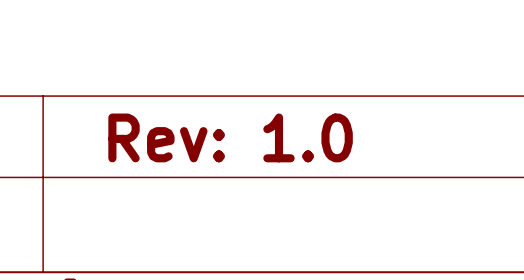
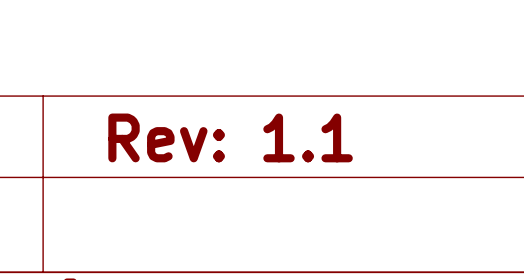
title block: Rev: 1.0 (230, 137) -> Rev: 1.1 (230, 137)

